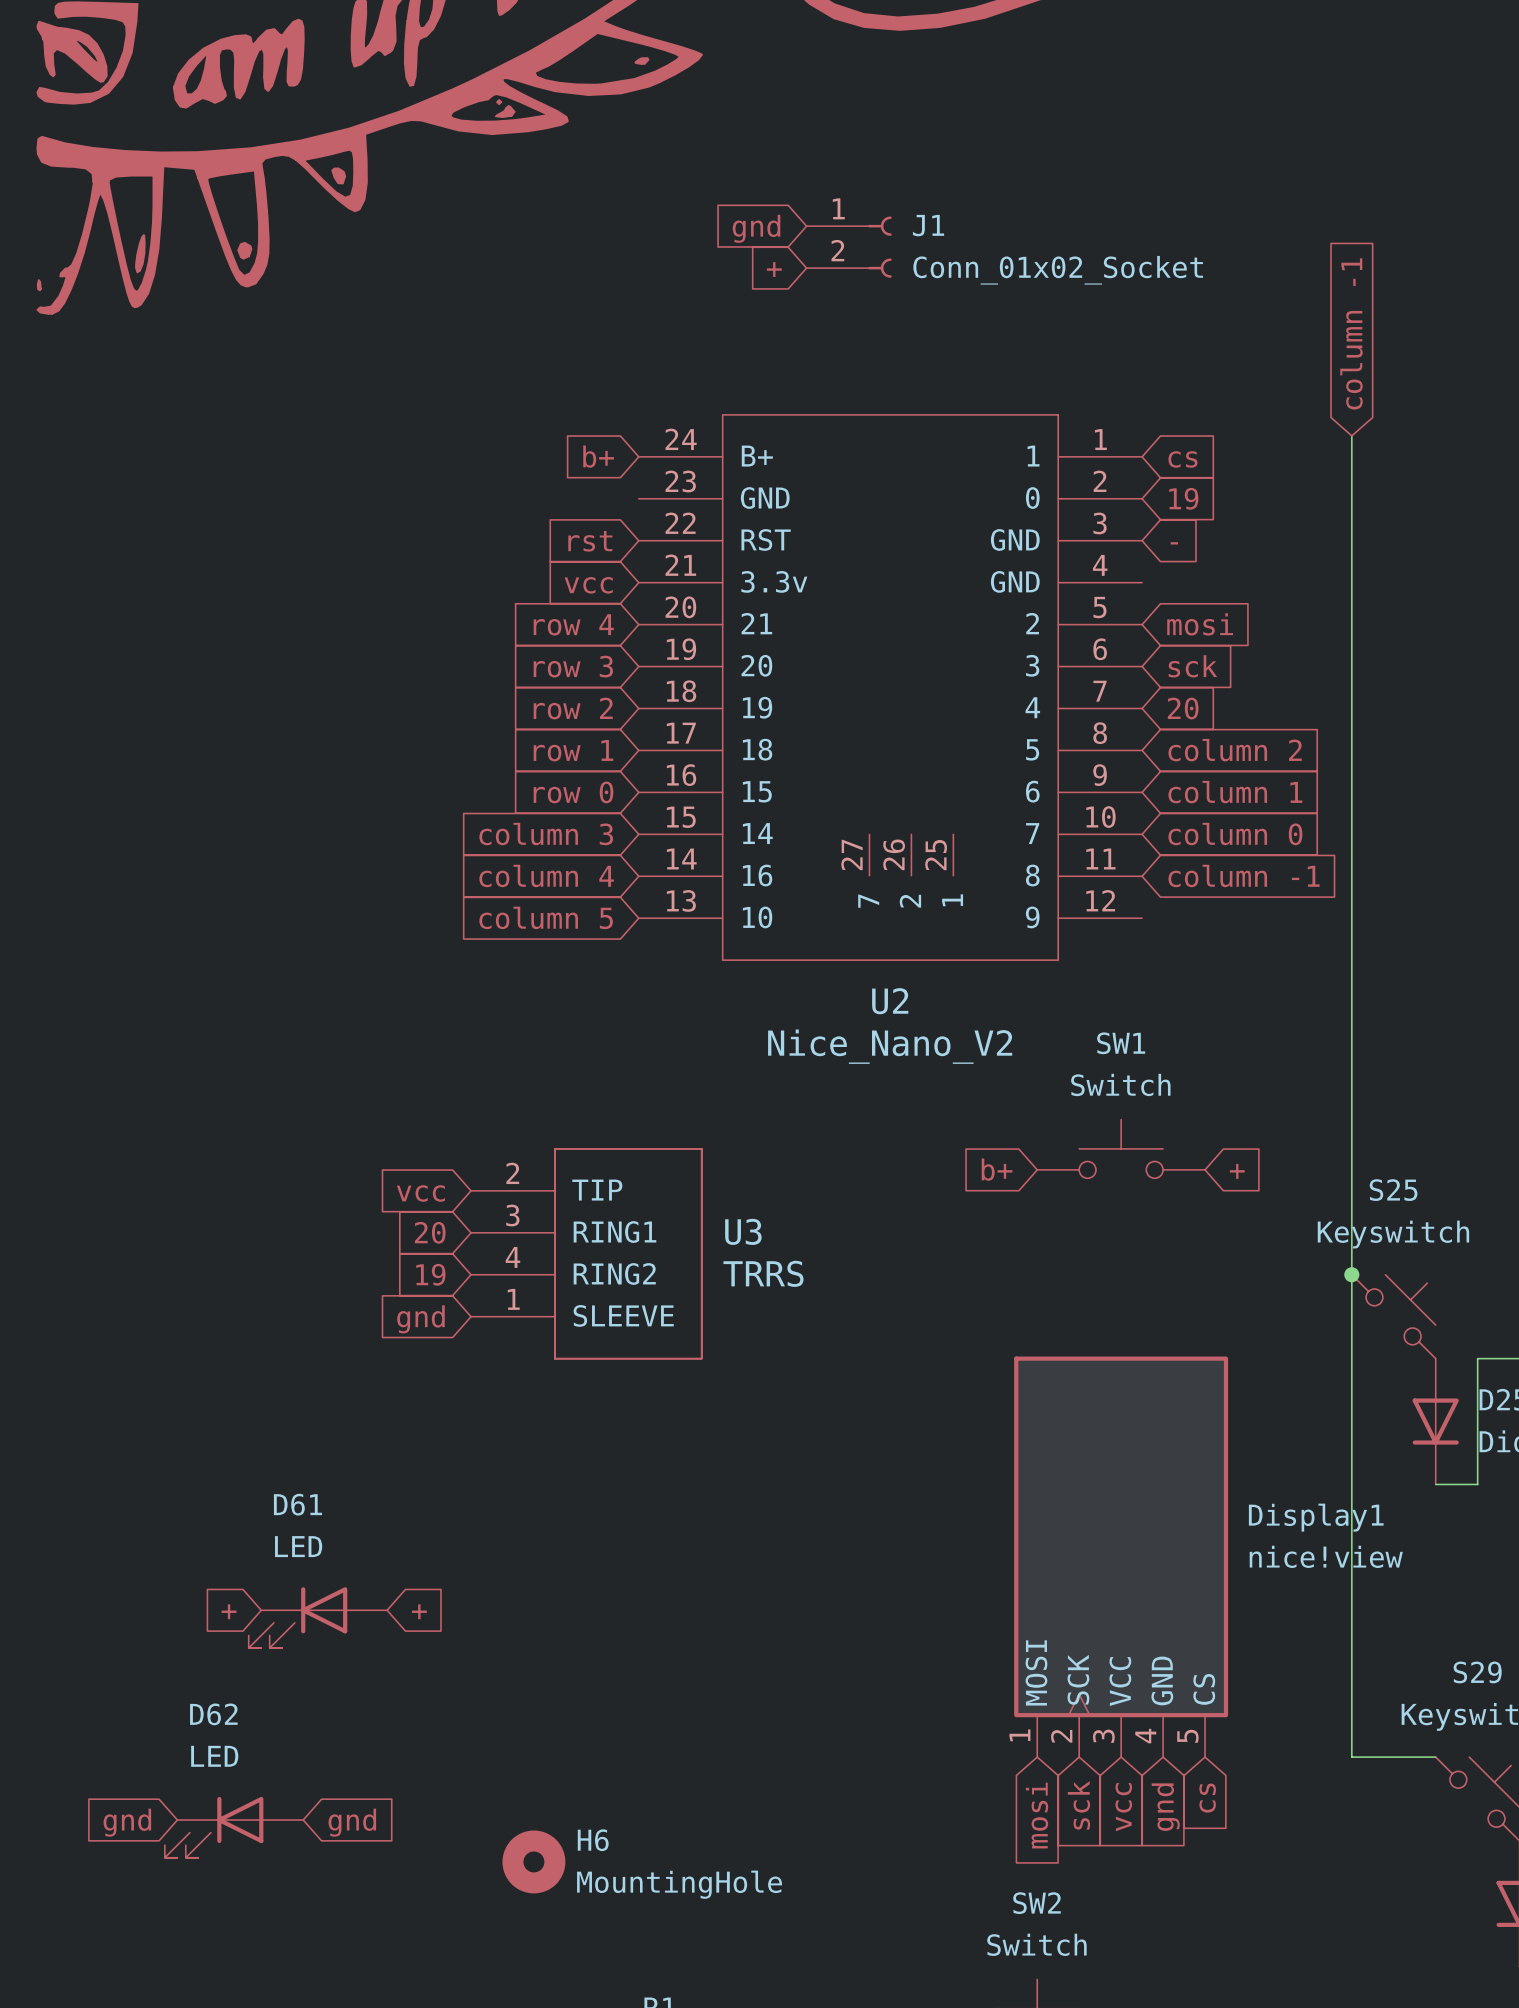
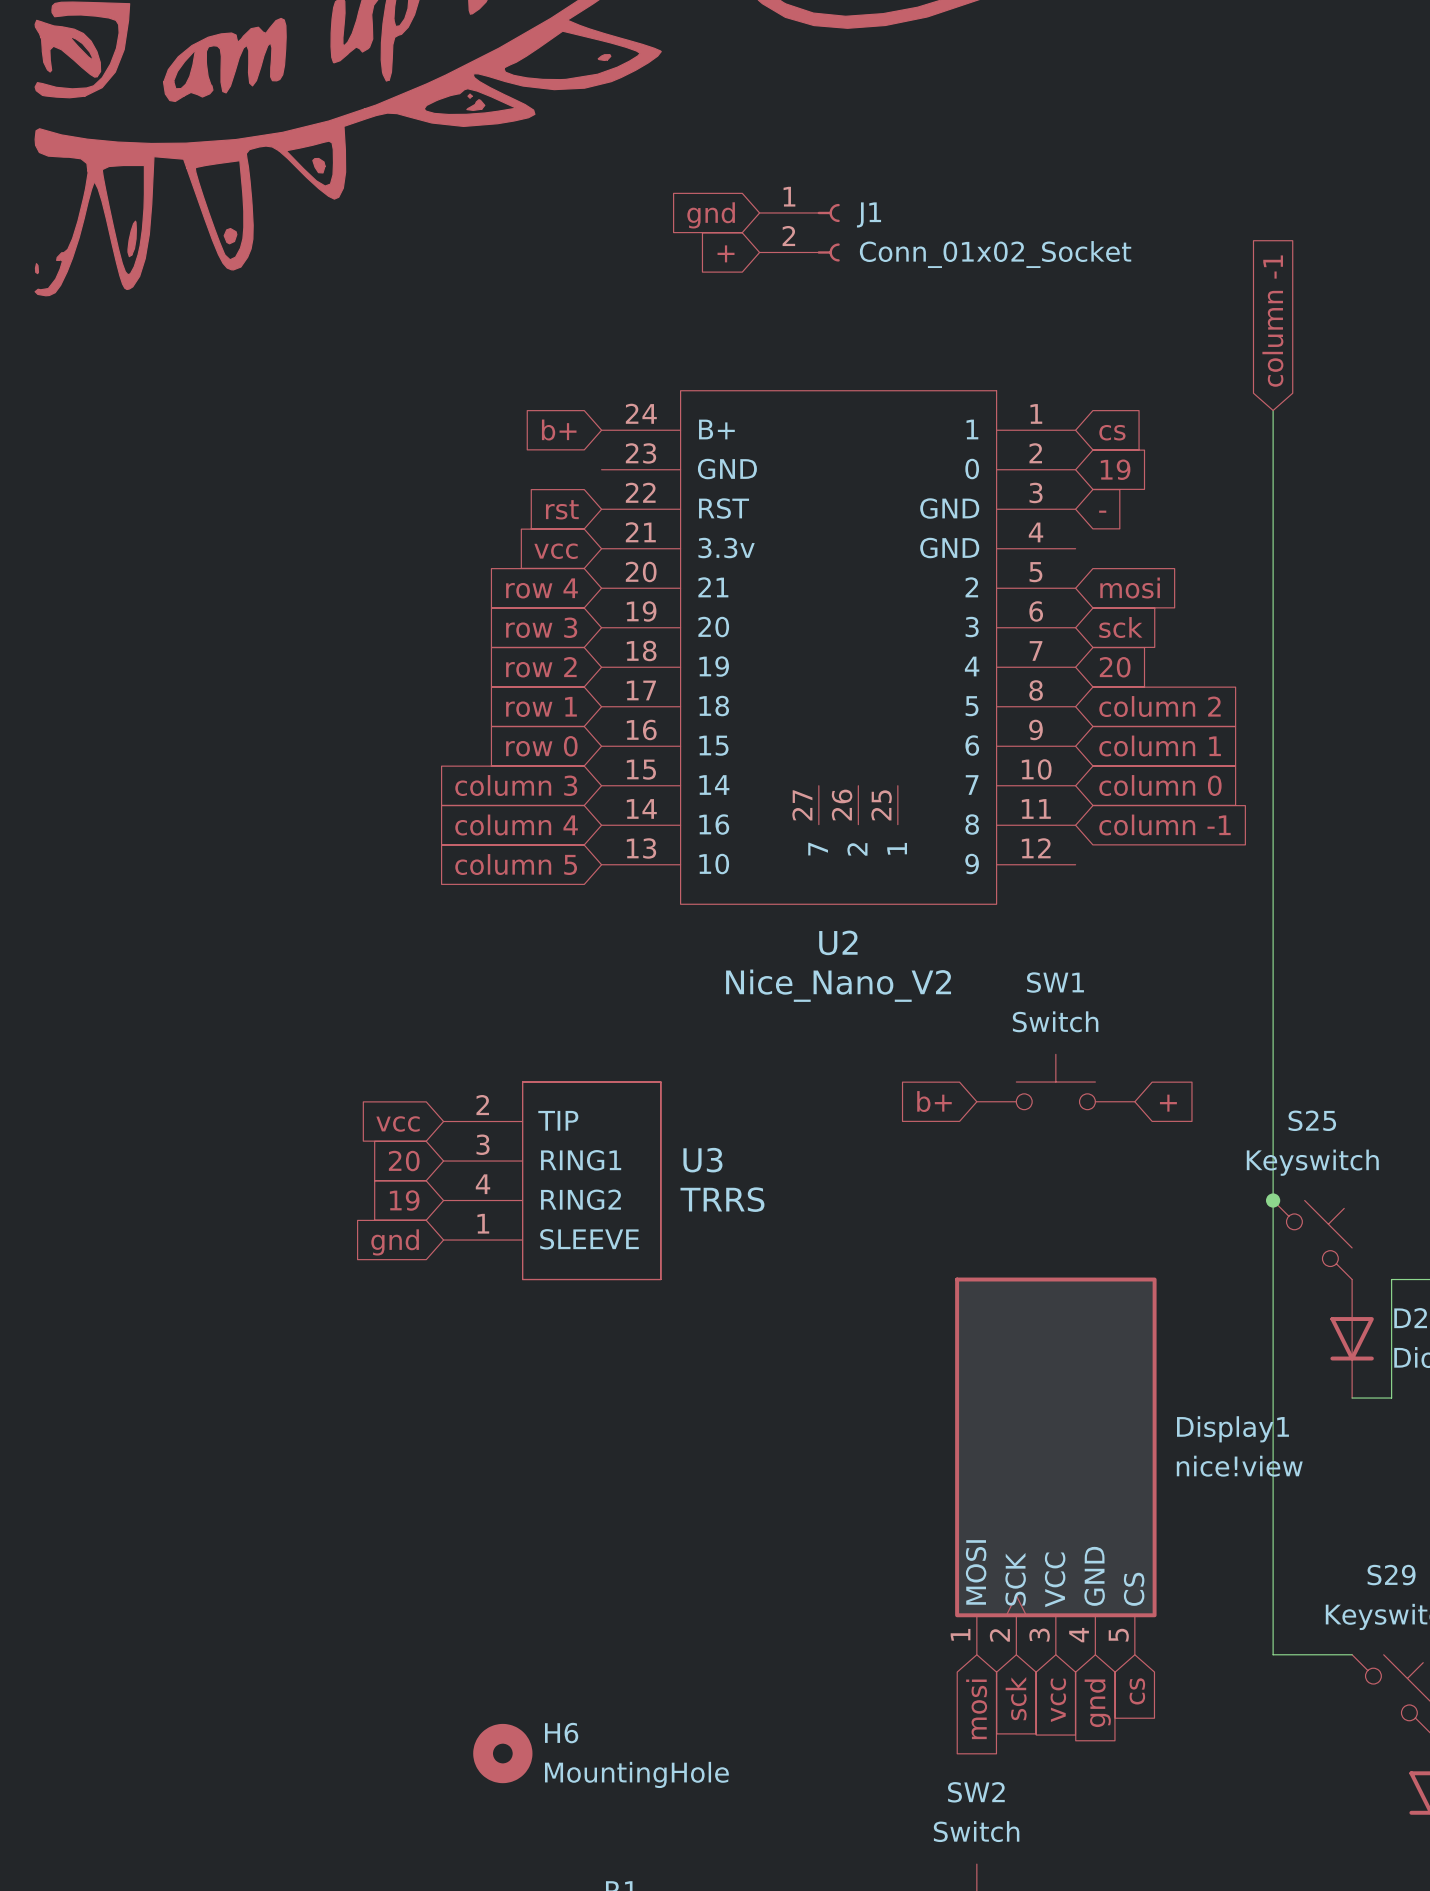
global label: + (229, 1611) -> none
global label: + (419, 1611) -> none
D61: LED (317, 1617) -> none
global label: gnd (127, 1822) -> none
global label: gnd (352, 1822) -> none
D62: LED (234, 1827) -> none

